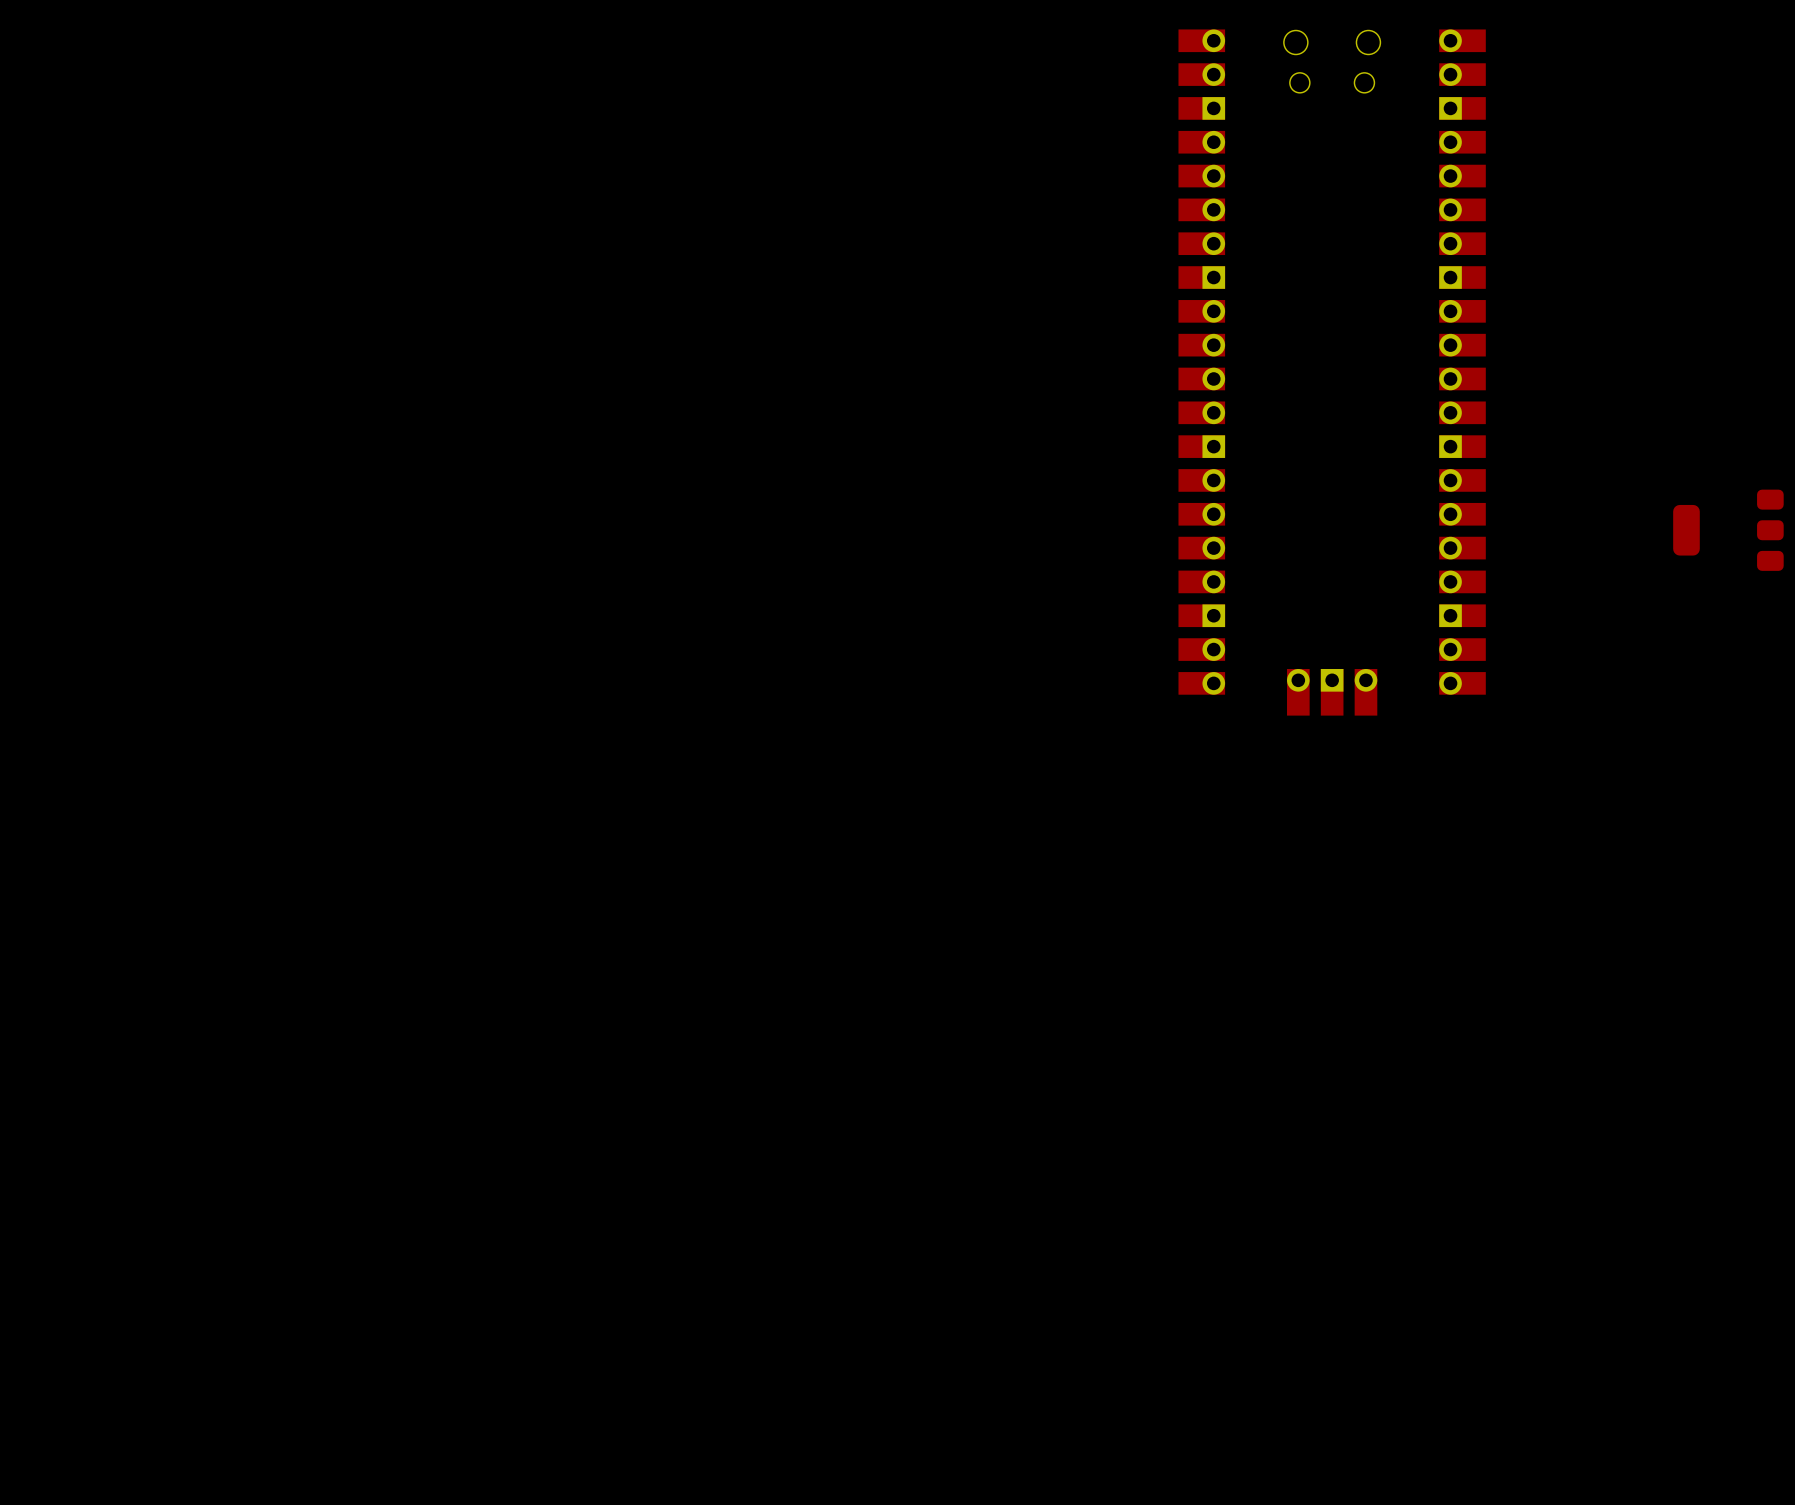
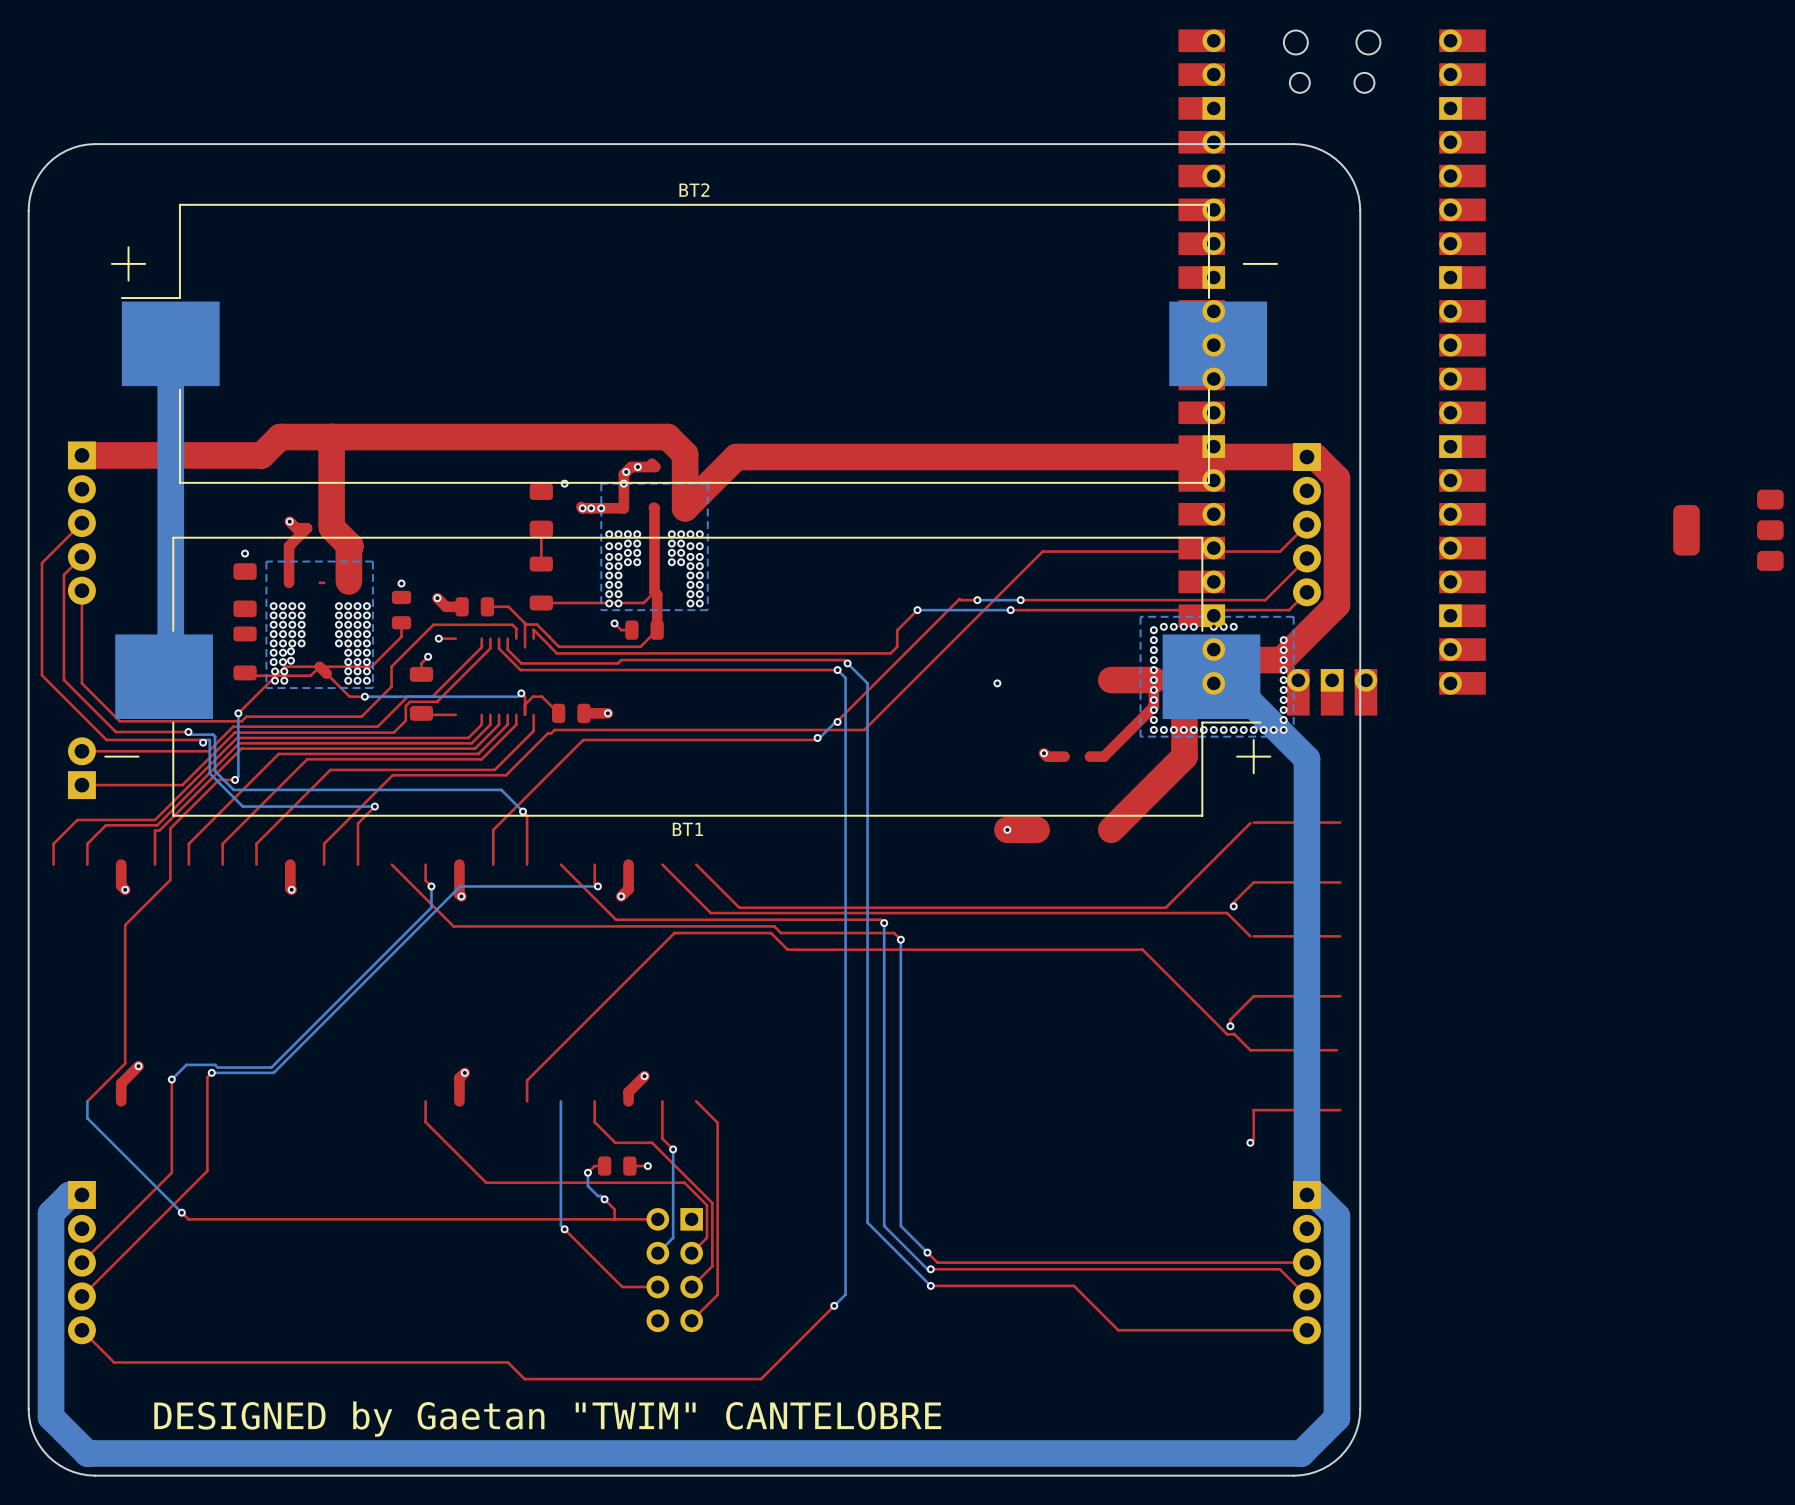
board edge: none -> (1293, 144) (95, 144) (73, 147) (59, 154) (48, 163) (35, 181) (30, 195) (28, 210) (28, 1409) (30, 1423) (35, 1437) (48, 1456) (66, 1469) (80, 1474) (95, 1475) (1293, 1475) (1308, 1474) (1322, 1469) (1340, 1456) (1353, 1437) (1358, 1423) (1360, 1409) (1360, 210) (1358, 195) (1353, 181) (1340, 163) (1329, 154) (1315, 147) (1293, 144)
bottom track: none -> (170, 343) (170, 676)
BT2: none -> (694, 343)
top track: none -> (331, 437) (331, 526)
top track: none -> (81, 455) (261, 455) (280, 437) (667, 437) (685, 454) (685, 508) (736, 457) (1315, 457) (1336, 478) (1336, 604) (1281, 660) (1240, 660)
top track: none -> (651, 463) (655, 467) (631, 467) (623, 474) (623, 508) (581, 506)
via: none -> (637, 467)
via: none -> (626, 472)
via: none -> (564, 483)
via: none -> (623, 483)
bottom zone outline: none -> (707, 483) (707, 610) (601, 610) (601, 483) (707, 483)
top track: none -> (653, 507) (654, 592)
via: none -> (582, 508)
via: none -> (591, 508)
via: none -> (601, 508)
part: none -> (541, 510)
top track: none -> (289, 521) (296, 528) (307, 528) (289, 546) (289, 582)
via: none -> (289, 521)
top track: none -> (81, 523) (41, 563) (41, 675) (106, 739) (200, 739) (203, 742)
part: none -> (81, 523)
top track: none -> (1306, 524) (1280, 551) (1042, 551) (864, 729) (554, 729) (547, 733) (506, 775) (392, 775) (324, 843) (324, 864)
part: none -> (1306, 524)
top track: none -> (332, 528) (350, 546) (348, 581) (350, 580)
top track: none -> (541, 528) (541, 564)
via: none -> (609, 534)
via: none -> (618, 534)
via: none -> (627, 534)
via: none -> (637, 534)
via: none -> (671, 534)
via: none -> (681, 534)
via: none -> (690, 534)
via: none -> (699, 534)
via: none -> (627, 543)
via: none -> (637, 543)
via: none -> (671, 543)
via: none -> (681, 543)
via: none -> (609, 546)
via: none -> (618, 546)
via: none -> (690, 546)
via: none -> (699, 546)
via: none -> (627, 552)
via: none -> (637, 552)
via: none -> (671, 552)
via: none -> (681, 552)
via: none -> (245, 553)
top track: none -> (81, 556) (63, 574) (63, 680) (115, 731) (188, 731)
via: none -> (609, 556)
via: none -> (618, 556)
via: none -> (690, 556)
via: none -> (699, 556)
top track: none -> (1306, 558) (1265, 600) (1020, 600)
bottom zone outline: none -> (372, 561) (372, 688) (266, 688) (266, 561) (372, 561)
via: none -> (627, 562)
via: none -> (637, 562)
via: none -> (671, 562)
via: none -> (681, 562)
via: none -> (609, 566)
via: none -> (618, 566)
via: none -> (690, 566)
via: none -> (699, 566)
via: none -> (609, 575)
via: none -> (618, 575)
via: none -> (690, 575)
via: none -> (699, 575)
top track: none -> (324, 582) (319, 582)
via: none -> (401, 583)
part: none -> (541, 583)
via: none -> (609, 584)
via: none -> (618, 584)
via: none -> (690, 584)
via: none -> (699, 584)
top track: none -> (81, 590) (81, 683) (119, 721) (241, 721) (246, 716) (361, 716) (391, 686) (391, 666) (433, 624) (512, 624) (516, 628) (516, 638)
part: none -> (245, 590)
top track: none -> (654, 592) (643, 602) (541, 602)
top track: none -> (654, 592) (657, 594) (657, 630) (640, 646) (558, 646) (548, 636)
top track: none -> (1306, 592) (1289, 610) (1010, 610)
via: none -> (609, 594)
via: none -> (618, 594)
via: none -> (690, 594)
via: none -> (699, 594)
top track: none -> (437, 598) (446, 606) (462, 606)
via: none -> (437, 598)
top track: none -> (977, 600) (959, 598) (837, 722)
via: none -> (977, 600)
bottom track: none -> (1020, 600) (977, 600)
via: none -> (1020, 600)
via: none -> (609, 603)
via: none -> (618, 603)
via: none -> (690, 603)
via: none -> (699, 603)
via: none -> (273, 606)
via: none -> (283, 606)
via: none -> (292, 606)
via: none -> (301, 606)
via: none -> (338, 606)
via: none -> (348, 606)
via: none -> (357, 606)
via: none -> (366, 606)
part: none -> (474, 606)
top track: none -> (487, 606) (508, 606) (526, 624) (537, 624) (549, 636)
part: none -> (401, 610)
top track: none -> (917, 610) (897, 630) (897, 646) (890, 653) (556, 653) (550, 646)
via: none -> (917, 610)
bottom track: none -> (1010, 610) (917, 610)
via: none -> (1010, 610)
via: none -> (273, 615)
via: none -> (283, 615)
via: none -> (292, 615)
via: none -> (301, 615)
via: none -> (338, 615)
via: none -> (348, 615)
via: none -> (357, 615)
via: none -> (366, 615)
bottom zone outline: none -> (1293, 616) (1140, 616) (1140, 736) (1293, 736) (1293, 616)
top track: none -> (401, 622) (401, 636) (371, 666) (285, 666) (238, 713)
top track: none -> (525, 623) (525, 647)
top track: none -> (614, 623) (621, 630) (631, 630)
via: none -> (614, 623)
via: none -> (273, 624)
via: none -> (283, 624)
via: none -> (292, 624)
via: none -> (301, 624)
via: none -> (338, 624)
via: none -> (348, 624)
via: none -> (357, 624)
via: none -> (366, 624)
via: none -> (1163, 626)
via: none -> (1173, 626)
via: none -> (1183, 626)
via: none -> (1193, 626)
via: none -> (1213, 626)
via: none -> (1223, 626)
via: none -> (1233, 626)
part: none -> (644, 630)
via: none -> (1153, 630)
via: none -> (273, 634)
via: none -> (283, 634)
via: none -> (292, 634)
via: none -> (301, 634)
via: none -> (338, 634)
via: none -> (348, 634)
via: none -> (357, 634)
via: none -> (366, 634)
via: none -> (438, 638)
top track: none -> (455, 638) (438, 638)
top track: none -> (481, 638) (481, 647) (432, 696) (407, 696) (377, 726) (233, 726) (208, 751) (81, 751)
top track: none -> (490, 638) (490, 648) (437, 701) (410, 701) (405, 706) (405, 720) (393, 732) (234, 732) (182, 785) (81, 785)
top track: none -> (499, 638) (499, 648) (520, 670) (837, 670)
top track: none -> (507, 638) (507, 649) (521, 663) (617, 663) (621, 660) (844, 660) (847, 663)
top track: none -> (533, 638) (533, 629) (550, 646)
via: none -> (1153, 640)
via: none -> (1283, 640)
via: none -> (273, 643)
via: none -> (283, 643)
via: none -> (292, 643)
via: none -> (301, 643)
via: none -> (338, 643)
via: none -> (348, 643)
via: none -> (357, 643)
via: none -> (366, 643)
via: none -> (1153, 650)
via: none -> (1283, 650)
via: none -> (290, 651)
via: none -> (273, 652)
via: none -> (283, 652)
via: none -> (348, 652)
via: none -> (357, 652)
via: none -> (366, 652)
part: none -> (245, 653)
top track: none -> (428, 656) (421, 663) (421, 674)
via: none -> (428, 656)
via: none -> (290, 660)
via: none -> (1153, 660)
via: none -> (1283, 660)
via: none -> (273, 662)
via: none -> (283, 662)
via: none -> (348, 662)
via: none -> (357, 662)
via: none -> (366, 662)
bottom track: none -> (847, 663) (867, 683) (867, 1222) (930, 1285)
via: none -> (847, 663)
top track: none -> (319, 666) (349, 696) (364, 696)
top track: none -> (319, 666) (310, 675) (245, 675)
top track: none -> (319, 666) (326, 673)
bottom track: none -> (837, 670) (845, 678) (845, 1294) (834, 1305)
via: none -> (837, 670)
via: none -> (1153, 670)
via: none -> (1283, 670)
via: none -> (275, 671)
via: none -> (284, 671)
via: none -> (348, 671)
via: none -> (357, 671)
via: none -> (366, 671)
bottom track: none -> (1218, 673) (1218, 676) (1224, 676) (1306, 758) (1306, 1194) (1315, 1194) (1336, 1216) (1336, 1418) (1301, 1453) (87, 1453) (51, 1417) (51, 1213) (69, 1194) (81, 1194)
BT1: none -> (687, 676)
via: none -> (275, 680)
via: none -> (284, 680)
via: none -> (348, 680)
via: none -> (357, 680)
via: none -> (366, 680)
top track: none -> (1111, 680) (1153, 680) (1153, 706) (1103, 756) (1089, 756)
via: none -> (1153, 680)
via: none -> (1283, 680)
via: none -> (997, 683)
via: none -> (1153, 690)
via: none -> (1283, 690)
part: none -> (421, 693)
top track: none -> (521, 693) (525, 697) (525, 714)
bottom track: none -> (521, 693) (518, 696) (364, 696)
via: none -> (521, 693)
via: none -> (364, 696)
via: none -> (1153, 700)
via: none -> (1283, 700)
top track: none -> (525, 704) (533, 696) (541, 696) (558, 713)
top track: none -> (1184, 704) (1184, 756) (1111, 829)
via: none -> (1153, 710)
via: none -> (1283, 710)
bottom track: none -> (238, 713) (238, 776) (235, 779)
via: none -> (238, 713)
top track: none -> (421, 713) (455, 714)
part: none -> (571, 713)
top track: none -> (607, 713) (583, 713)
via: none -> (607, 713)
top track: none -> (481, 714) (481, 724) (468, 737) (237, 737) (155, 820) (77, 820) (53, 843) (53, 864)
top track: none -> (490, 714) (490, 724) (471, 743) (239, 743) (157, 825) (105, 825) (87, 843) (87, 864)
top track: none -> (499, 714) (499, 724) (475, 748) (241, 748) (159, 830) (155, 830) (155, 864)
top track: none -> (507, 714) (507, 724) (478, 753) (278, 753) (188, 843) (188, 864)
top track: none -> (516, 714) (516, 724) (481, 759) (307, 759) (222, 843) (222, 864)
top track: none -> (533, 714) (533, 730) (494, 769) (330, 769) (256, 843) (256, 864)
via: none -> (1153, 720)
via: none -> (1283, 720)
bottom track: none -> (837, 722) (817, 737)
via: none -> (837, 722)
via: none -> (1153, 729)
via: none -> (1163, 729)
via: none -> (1173, 729)
via: none -> (1183, 729)
via: none -> (1193, 729)
via: none -> (1203, 729)
via: none -> (1213, 729)
via: none -> (1223, 729)
via: none -> (1233, 729)
via: none -> (1243, 729)
via: none -> (1253, 729)
via: none -> (1263, 729)
via: none -> (1273, 729)
via: none -> (1283, 729)
bottom track: none -> (188, 731) (191, 734) (213, 734) (215, 736) (215, 771) (233, 789) (501, 789) (523, 811)
via: none -> (188, 731)
top track: none -> (817, 737) (815, 739) (583, 739) (493, 830) (493, 864)
via: none -> (817, 737)
bottom track: none -> (203, 742) (209, 739) (209, 773) (242, 806) (374, 806)
via: none -> (203, 742)
top track: none -> (1043, 753) (1047, 756) (1064, 756)
via: none -> (1043, 753)
part: none -> (81, 768)
top track: none -> (235, 779) (218, 779) (170, 828) (170, 879) (125, 925) (125, 1063) (87, 1101)
via: none -> (235, 779)
top track: none -> (374, 806) (357, 823) (357, 864)
via: none -> (374, 806)
top track: none -> (523, 811) (527, 815) (527, 864)
via: none -> (523, 811)
top track: none -> (1340, 822) (1253, 822)
top track: none -> (1250, 823) (1165, 907) (739, 907) (696, 864)
via: none -> (1007, 829)
top track: none -> (1036, 829) (1007, 829)
top track: none -> (121, 864) (121, 885) (125, 889)
top track: none -> (290, 864) (291, 889)
top track: none -> (391, 864) (453, 926) (774, 926) (781, 933) (894, 933) (900, 939)
top track: none -> (425, 864) (425, 880) (431, 886)
top track: none -> (459, 864) (459, 894) (461, 896)
top track: none -> (560, 864) (616, 919) (880, 919) (884, 923)
top track: none -> (594, 864) (594, 883) (597, 886)
top track: none -> (628, 864) (628, 889) (621, 896)
top track: none -> (662, 864) (710, 913) (1227, 913) (1250, 936)
top track: none -> (1340, 882) (1253, 882) (1233, 902) (1233, 906)
bottom track: none -> (431, 886) (431, 907) (271, 1067) (217, 1067) (215, 1064) (186, 1064) (171, 1079)
via: none -> (431, 886)
bottom track: none -> (597, 886) (460, 886) (273, 1072) (211, 1072)
via: none -> (597, 886)
via: none -> (125, 889)
via: none -> (291, 889)
via: none -> (461, 896)
via: none -> (621, 896)
via: none -> (1233, 906)
bottom track: none -> (884, 923) (884, 1226) (927, 1269) (930, 1269)
via: none -> (884, 923)
top track: none -> (1340, 936) (1253, 936)
bottom track: none -> (900, 939) (900, 1226) (927, 1252)
via: none -> (900, 939)
top track: none -> (1340, 996) (1253, 996) (1230, 1019) (1230, 1026)
via: none -> (1230, 1026)
top track: none -> (1336, 1050) (1250, 1050) (1234, 1033) (1227, 1034) (1142, 949) (787, 949) (771, 933) (674, 933) (527, 1080) (527, 1101)
top track: none -> (138, 1066) (121, 1083) (121, 1101)
via: none -> (138, 1066)
top track: none -> (211, 1072) (207, 1077) (207, 1171) (81, 1296)
via: none -> (211, 1072)
top track: none -> (464, 1072) (459, 1078) (459, 1101)
via: none -> (464, 1072)
top track: none -> (644, 1076) (628, 1092) (628, 1101)
via: none -> (644, 1076)
top track: none -> (171, 1079) (171, 1172) (81, 1262)
via: none -> (171, 1079)
bottom track: none -> (87, 1101) (87, 1118) (181, 1212)
top track: none -> (425, 1101) (425, 1122) (486, 1182) (684, 1182) (706, 1205) (706, 1237) (691, 1253)
bottom track: none -> (560, 1101) (560, 1225) (564, 1229)
top track: none -> (594, 1101) (594, 1122) (615, 1142) (652, 1142) (712, 1203) (712, 1266) (691, 1286)
top track: none -> (662, 1101) (662, 1138) (673, 1149)
top track: none -> (696, 1101) (717, 1122) (717, 1294) (691, 1320)
top track: none -> (1340, 1110) (1253, 1110) (1253, 1139) (1250, 1142)
via: none -> (1250, 1142)
bottom track: none -> (673, 1149) (673, 1237) (657, 1253)
via: none -> (673, 1149)
top track: none -> (604, 1166) (594, 1166) (587, 1172)
part: none -> (617, 1166)
top track: none -> (647, 1166) (629, 1166)
via: none -> (647, 1166)
bottom track: none -> (587, 1172) (587, 1186) (597, 1196) (604, 1199)
via: none -> (587, 1172)
top track: none -> (604, 1199) (614, 1209) (614, 1219)
via: none -> (604, 1199)
top track: none -> (181, 1212) (188, 1219) (657, 1219)
via: none -> (181, 1212)
top track: none -> (564, 1229) (622, 1286) (657, 1286)
via: none -> (564, 1229)
top track: none -> (927, 1252) (937, 1262) (1306, 1262)
via: none -> (927, 1252)
part: none -> (81, 1262)
part: none -> (1306, 1262)
top track: none -> (930, 1269) (1279, 1269) (1306, 1296)
via: none -> (930, 1269)
part: none -> (674, 1270)
top track: none -> (930, 1285) (1073, 1285) (1118, 1330) (1306, 1330)
via: none -> (930, 1285)
top track: none -> (834, 1305) (761, 1379) (524, 1379) (508, 1362) (114, 1362) (81, 1330)
via: none -> (834, 1305)
text: none -> DESIGNED by Gaetan "TWIM" CANTELOBRE (547, 1419)

